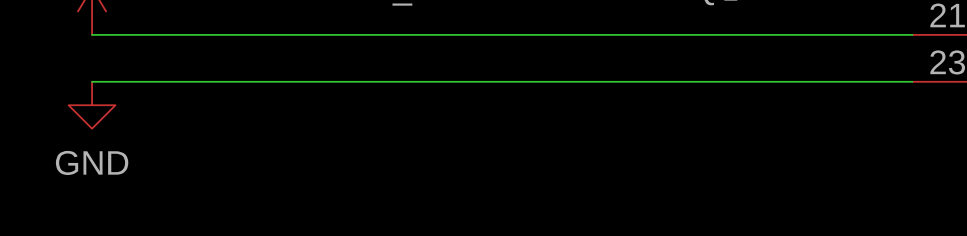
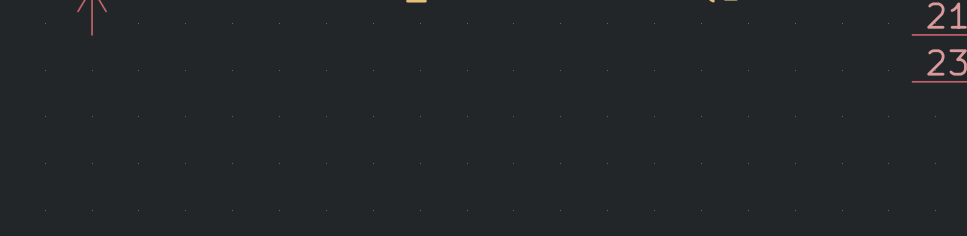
wire: (92, 34) (912, 34) -> none
wire: (92, 81) (912, 81) -> none
power symbol: GND (92, 105) -> none

